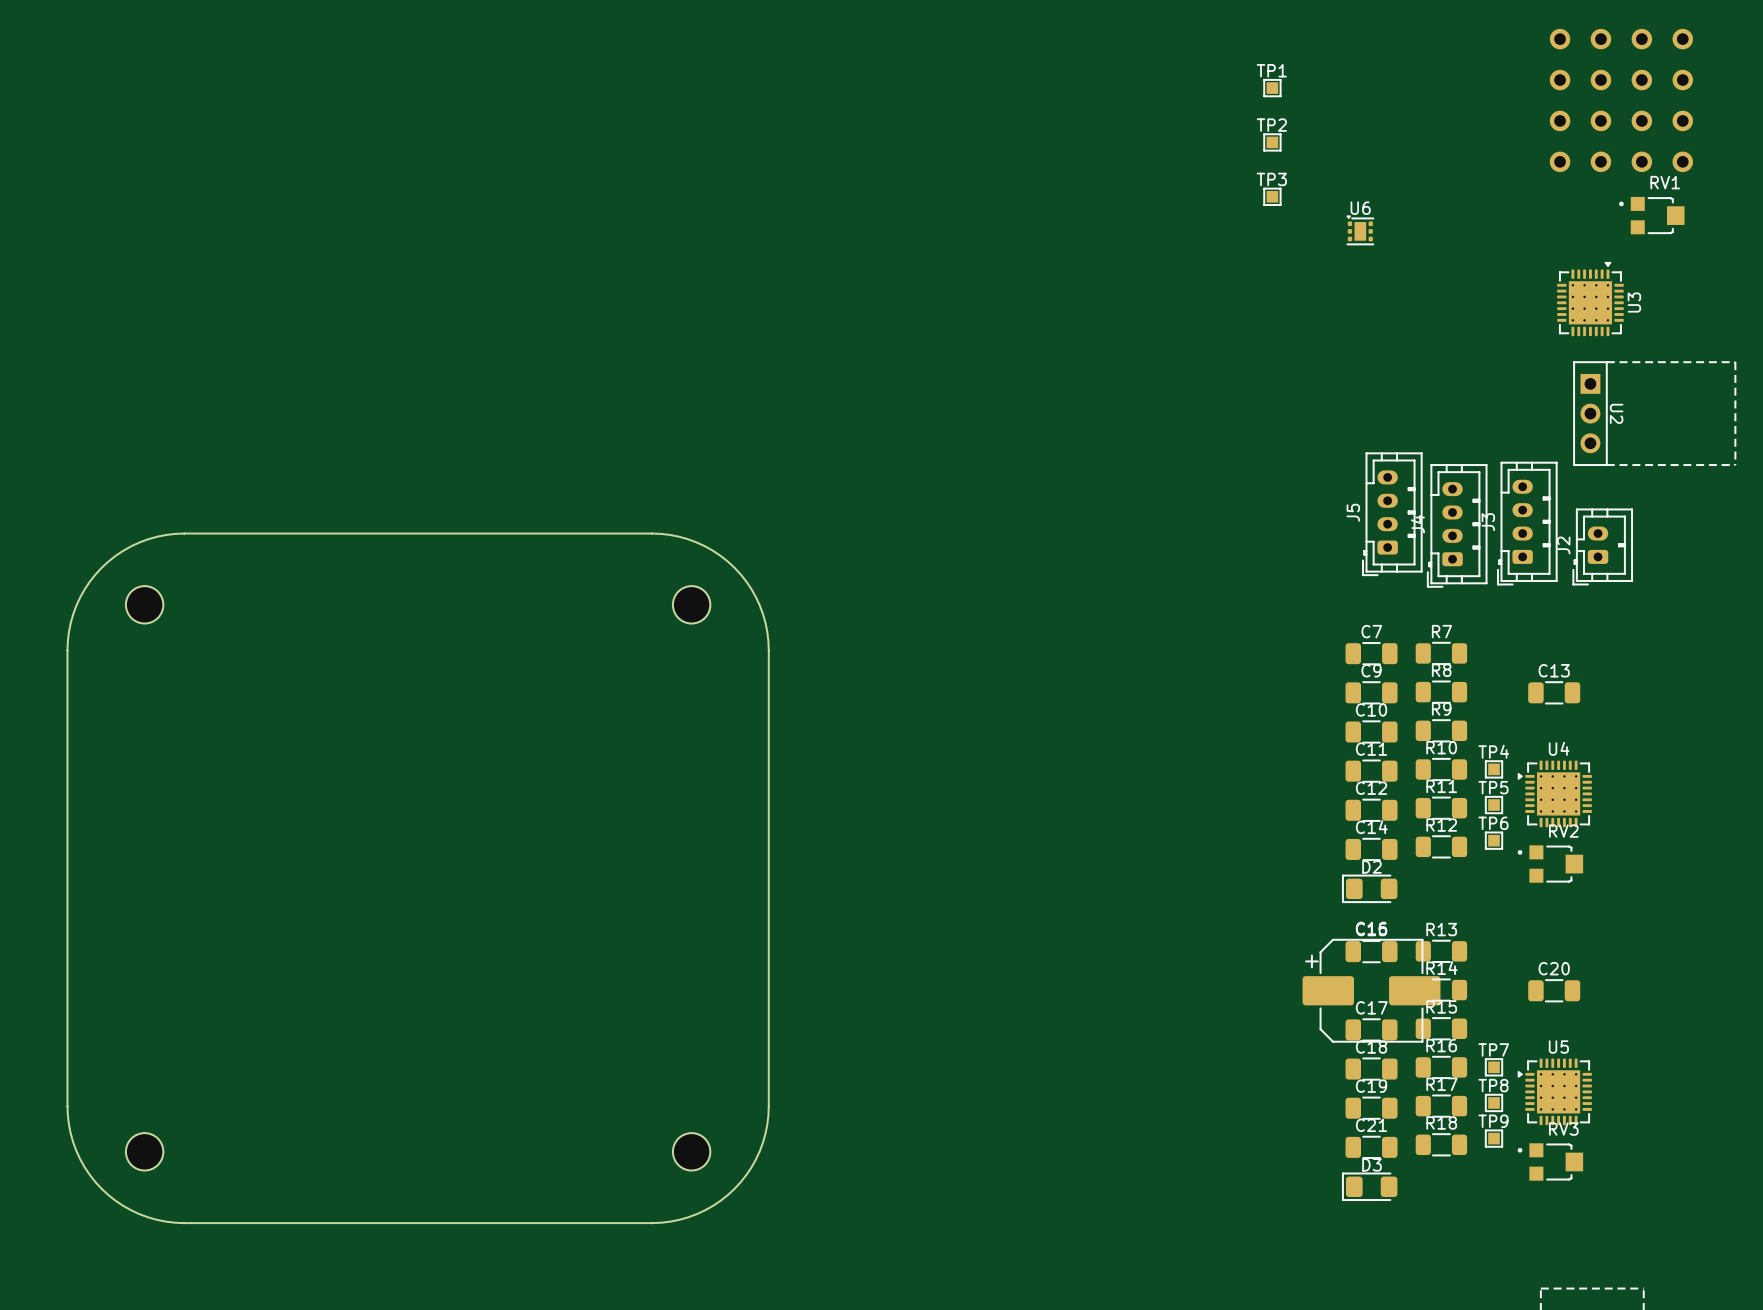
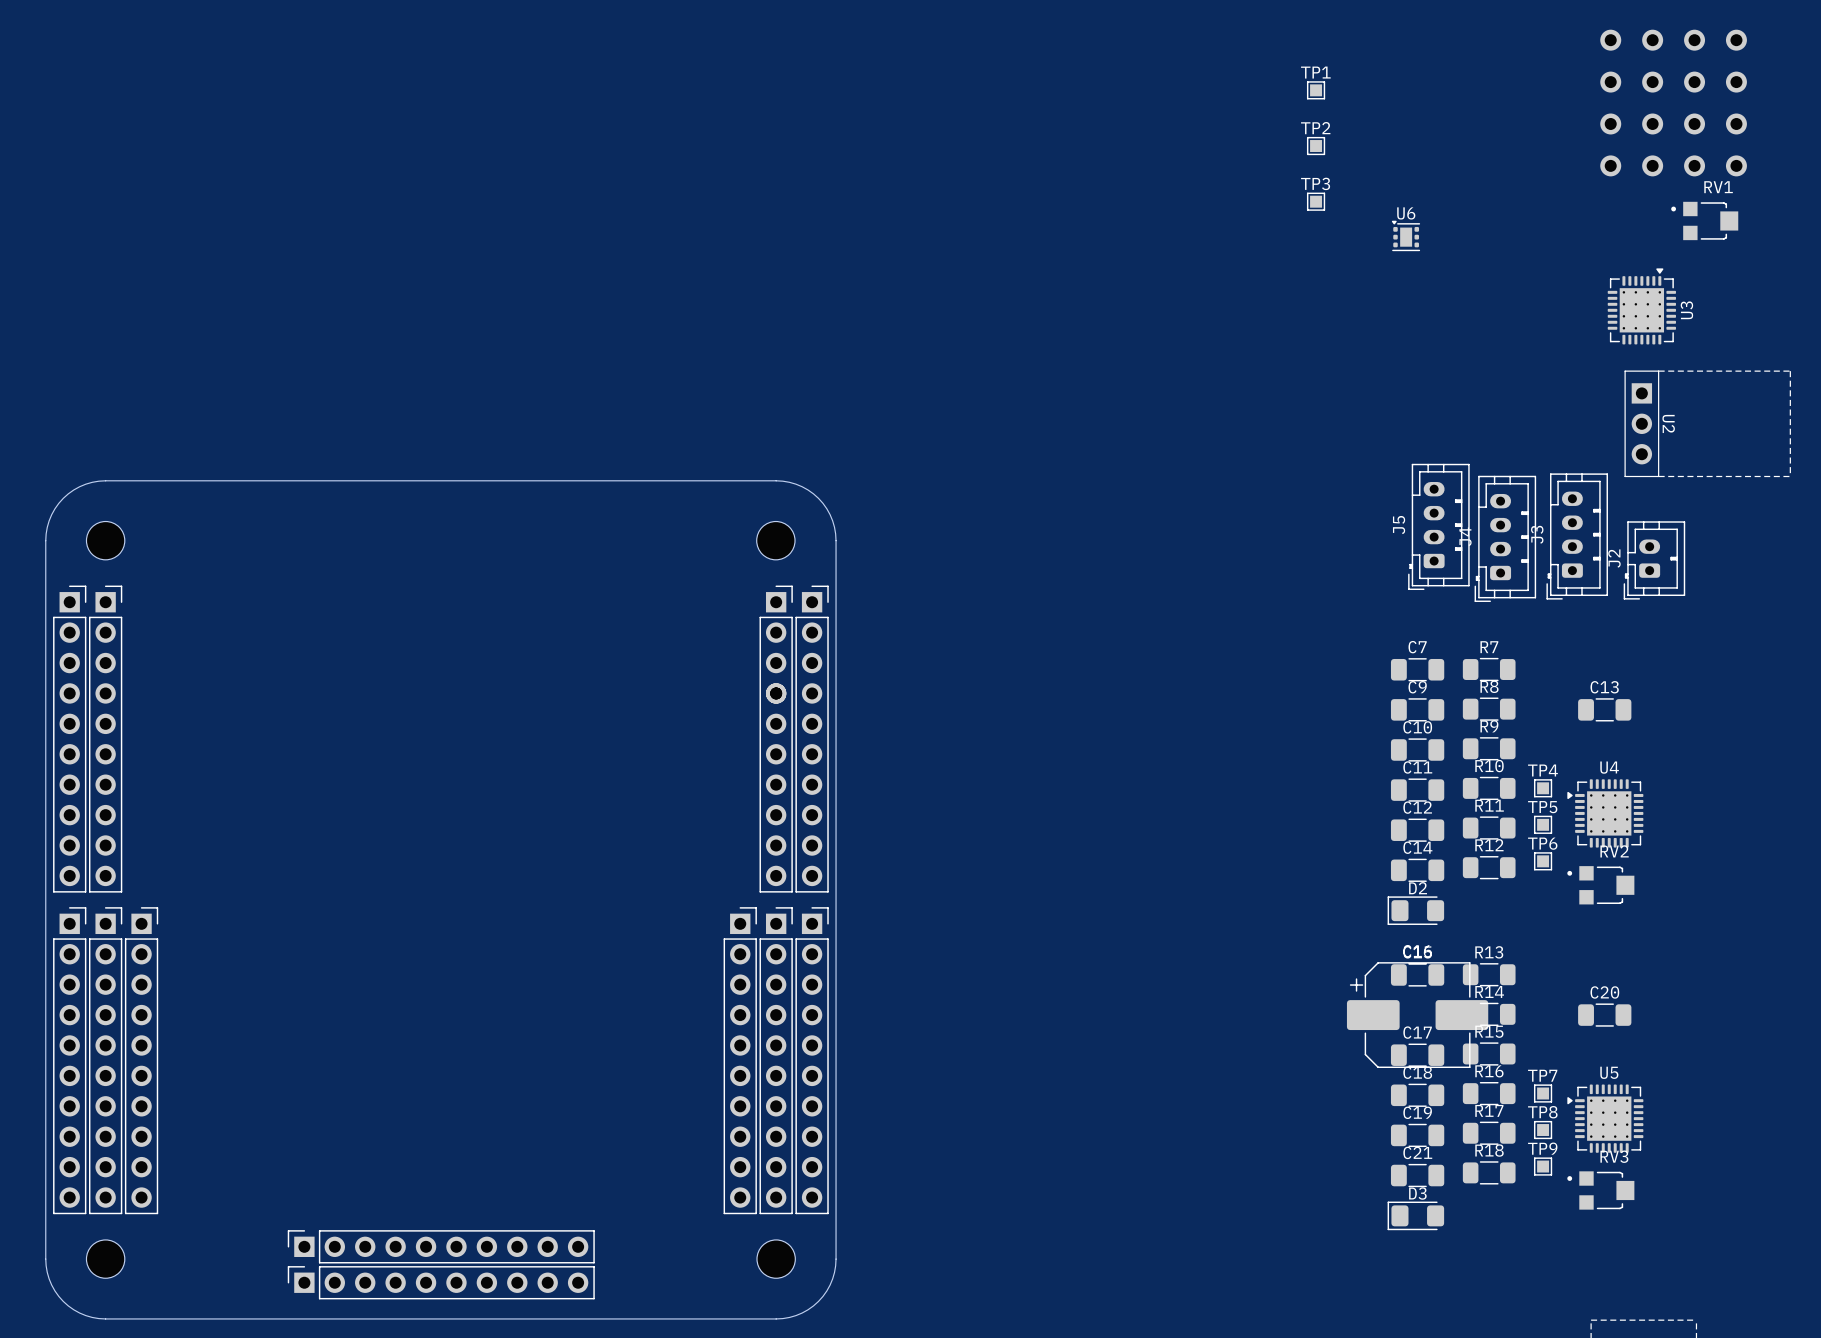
board edge: (184, 533) (661, 533) (688, 539) (704, 546) (727, 561) (740, 574) (759, 605) (768, 641) (768, 1106) (765, 1133) (756, 1159) (740, 1182) (727, 1195) (696, 1214) (661, 1222) (184, 1223) (157, 1219) (139, 1214) (115, 1200) (95, 1182) (76, 1150) (67, 1115) (68, 632) (80, 597) (89, 581) (108, 561) (131, 546) (148, 539) (184, 533) -> (105, 480) (92, 482) (79, 486) (63, 498) (51, 514) (46, 533) (45, 1259) (49, 1278) (58, 1296) (68, 1305) (79, 1313) (92, 1317) (105, 1318) (776, 1318) (795, 1315) (813, 1305) (822, 1296) (830, 1285) (834, 1272) (836, 1259) (836, 540) (832, 520) (822, 503) (813, 493) (802, 486) (789, 482) (776, 480) (105, 480)
part position: (144, 604) -> (105, 540)
part position: (691, 604) -> (775, 540)
part: none -> (776, 693)
part: none -> (69, 739)
part: none -> (105, 739)
part: none -> (776, 739)
part: none -> (812, 739)
part: none -> (69, 1060)
part: none -> (105, 1060)
part: none -> (141, 1060)
part: none -> (740, 1060)
part: none -> (776, 1060)
part: none -> (812, 1060)
part position: (144, 1151) -> (105, 1259)
part position: (691, 1151) -> (776, 1259)
part: none -> (441, 1246)
part: none -> (441, 1282)

